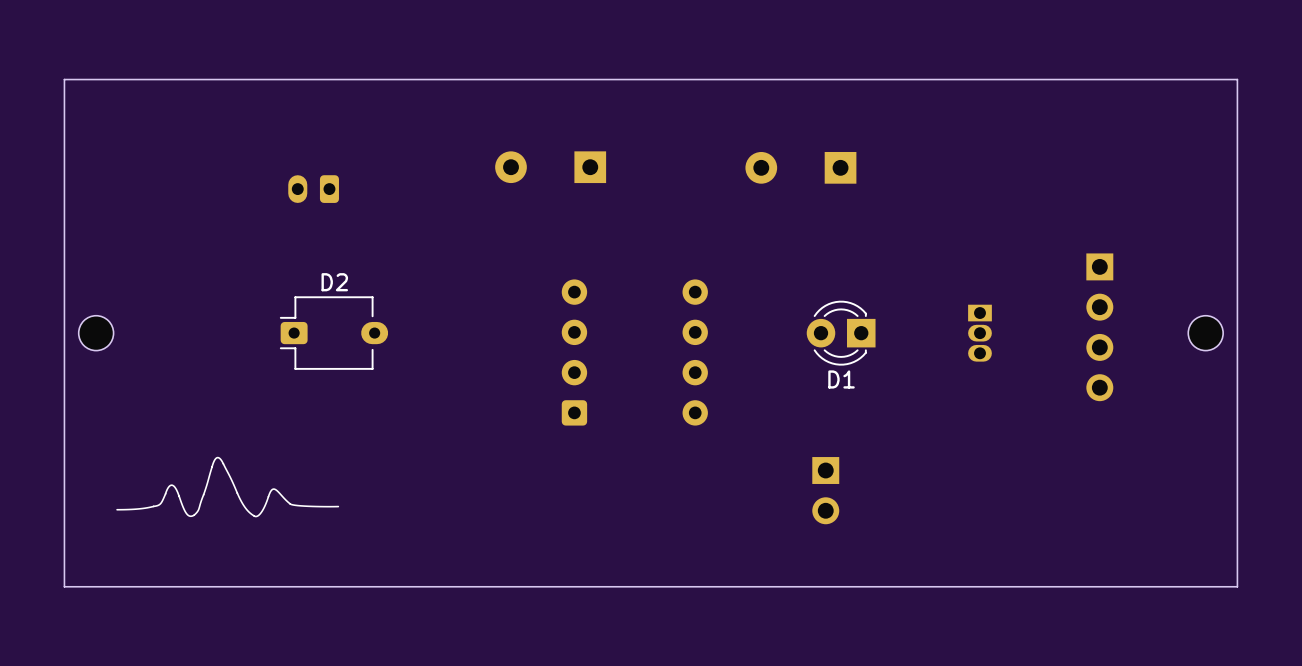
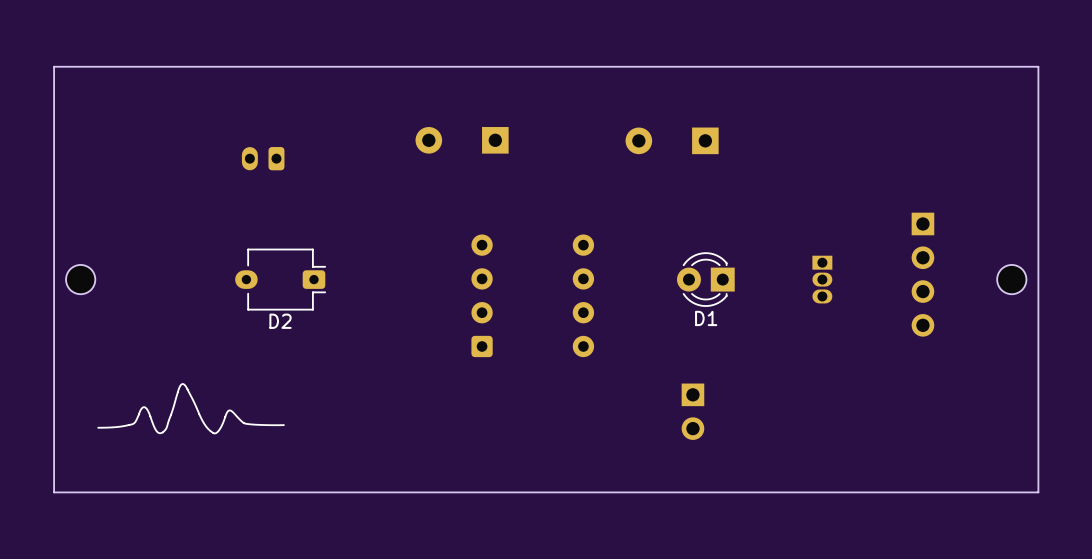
D2 rotation: 0° (333, 333) -> 180° (280, 279)

